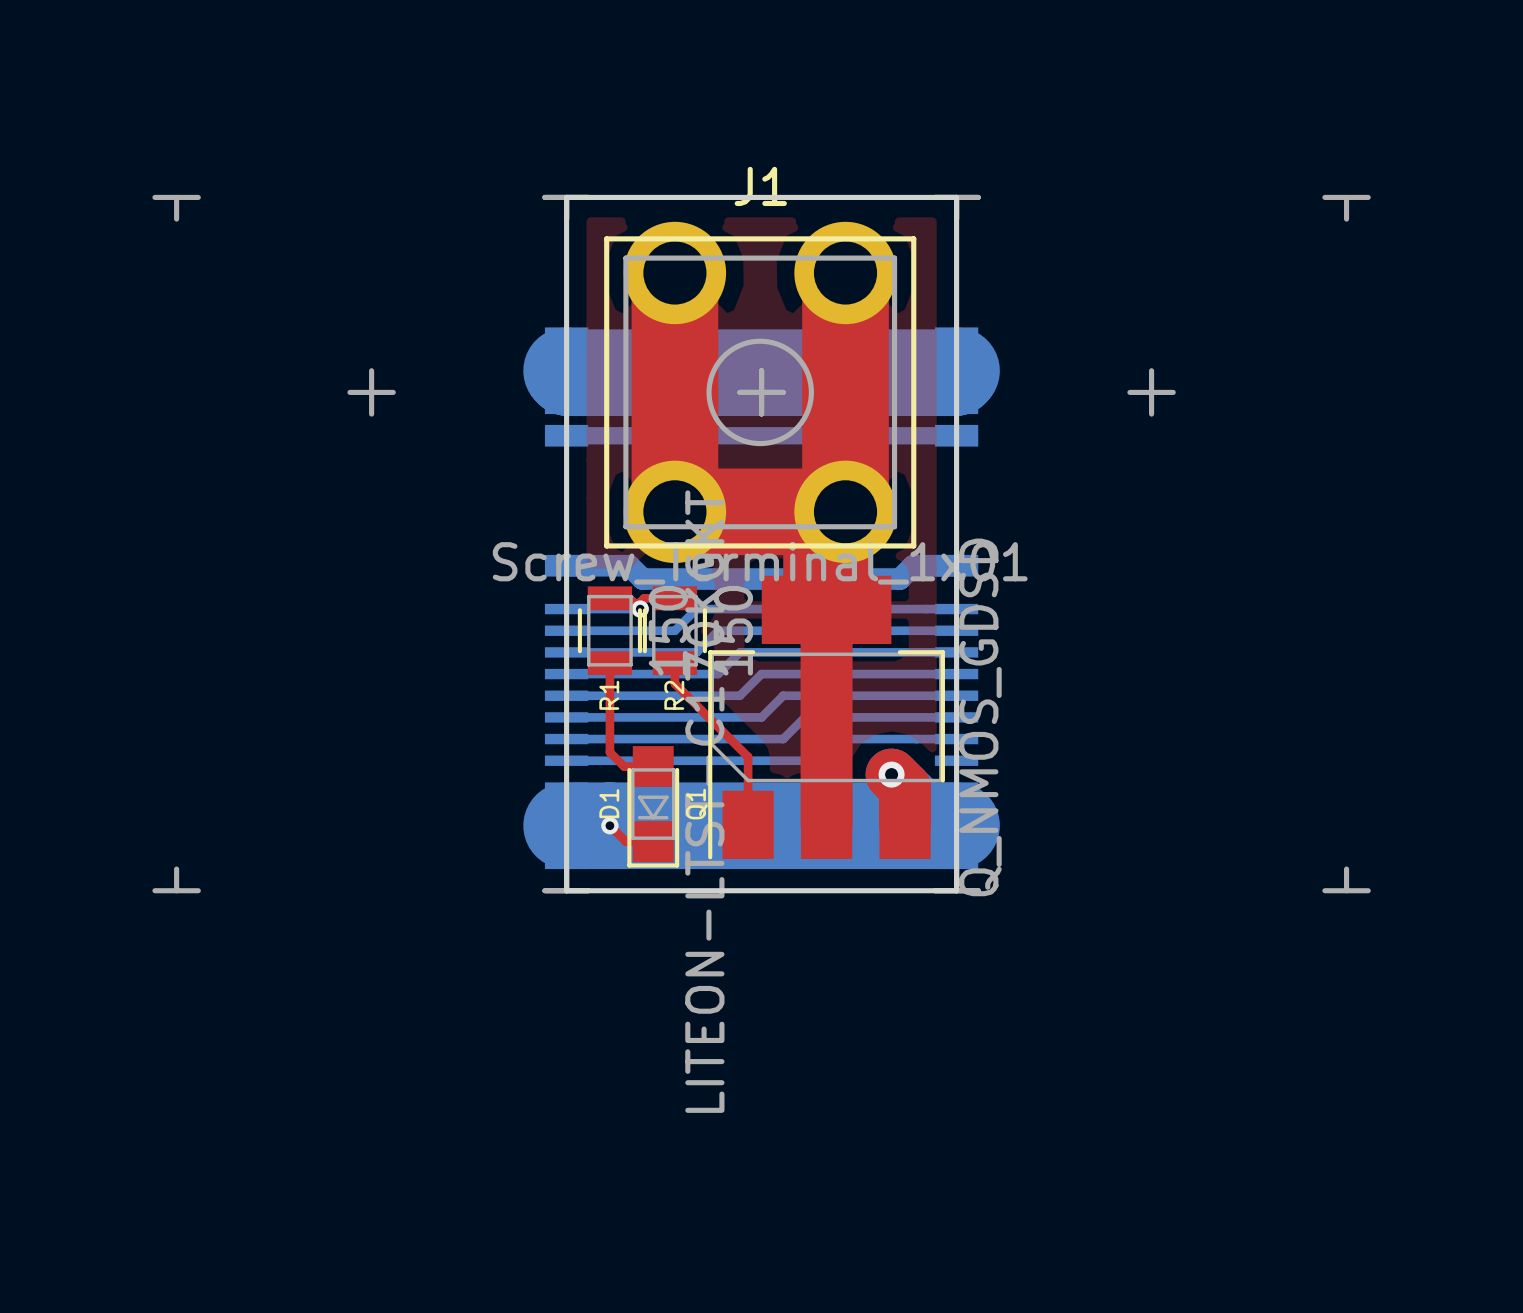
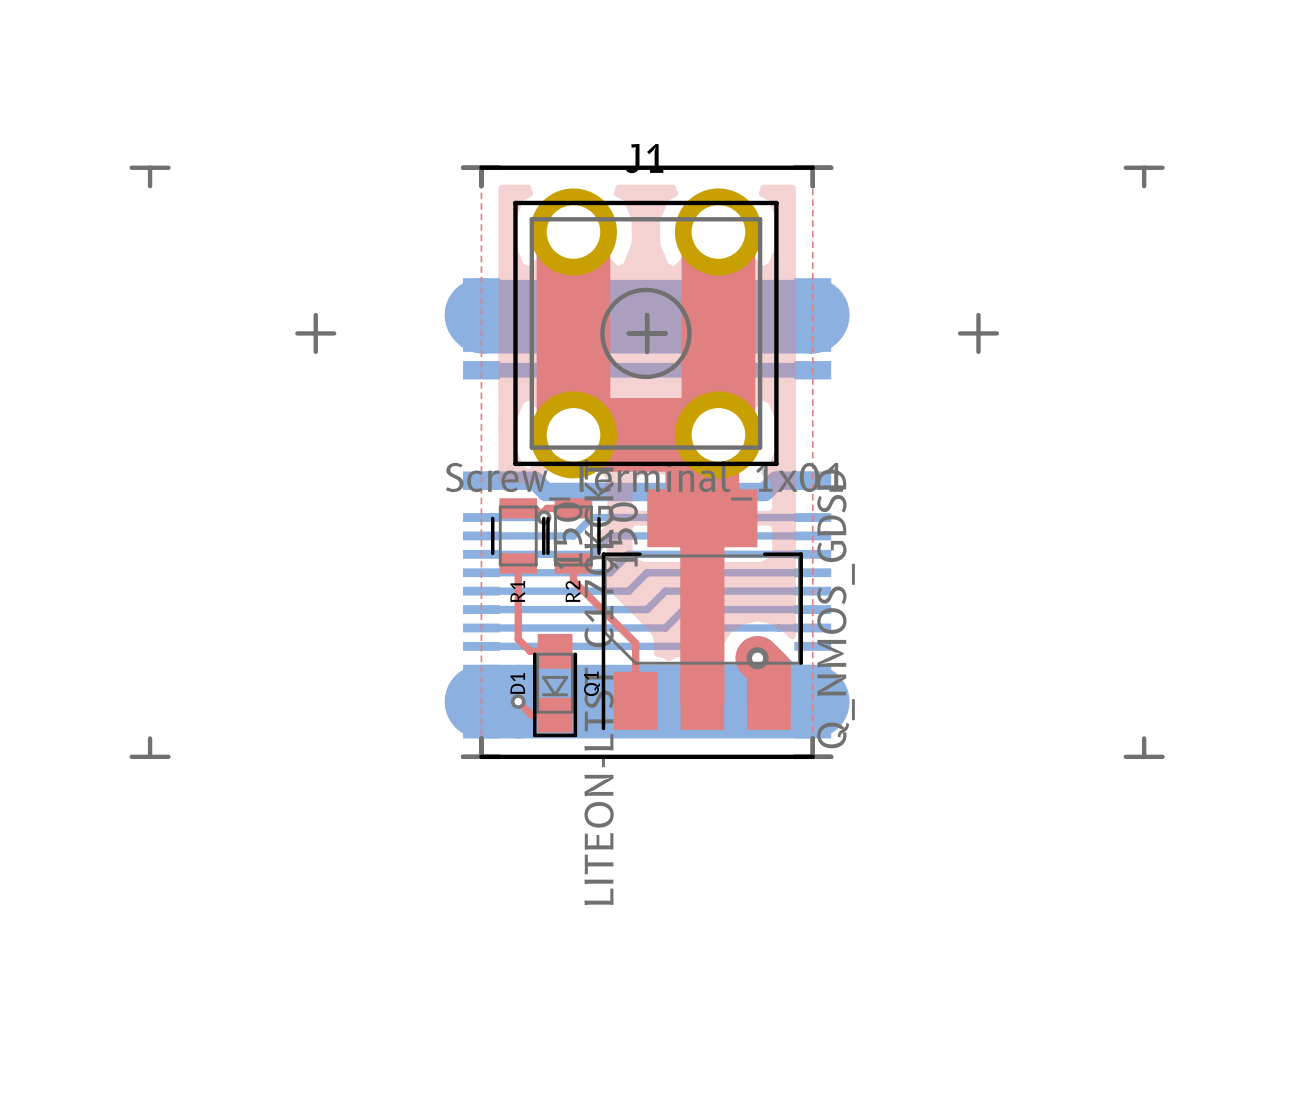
board edge: (566, 197) (566, 890) -> none
board edge: (956, 197) (956, 890) -> none

